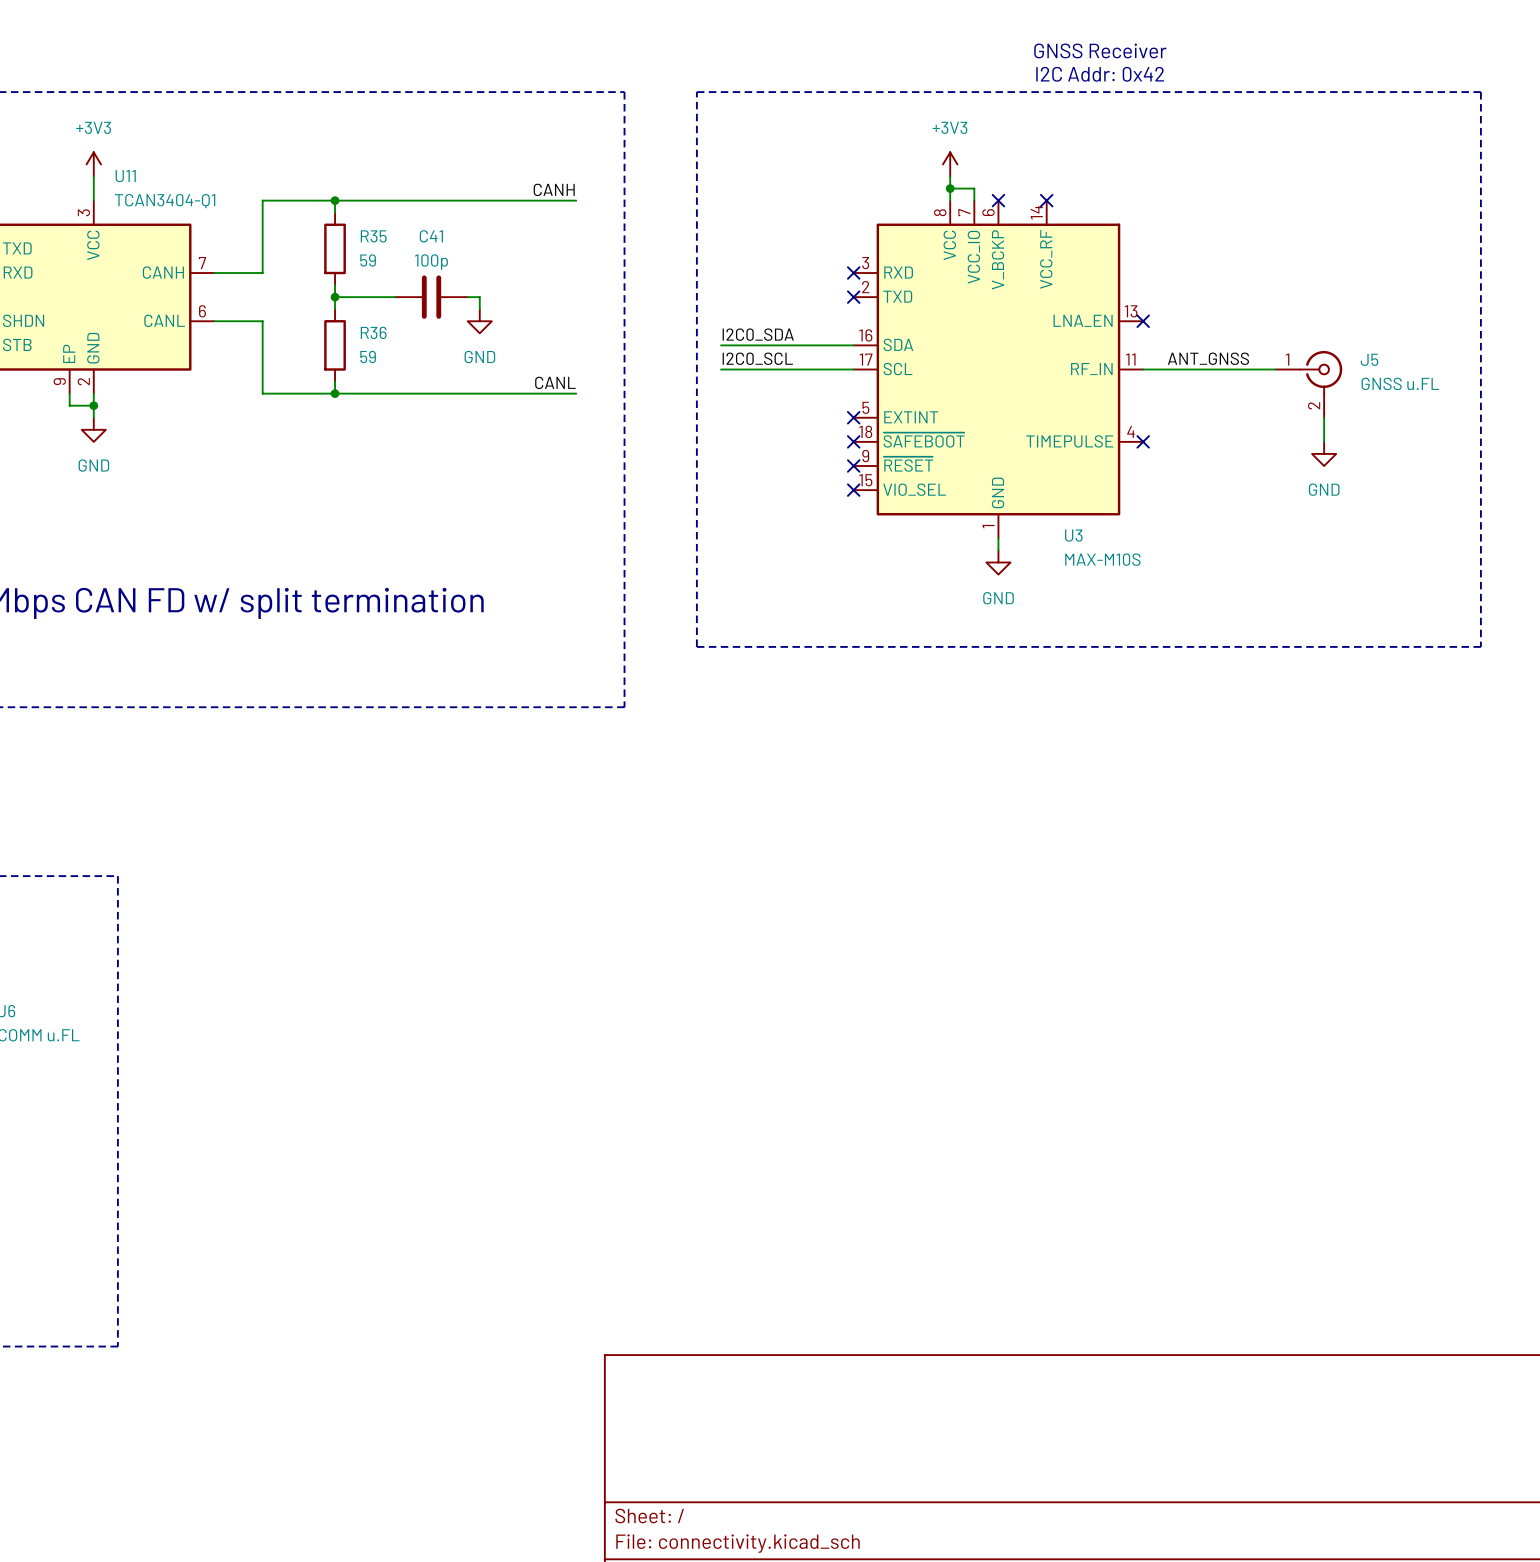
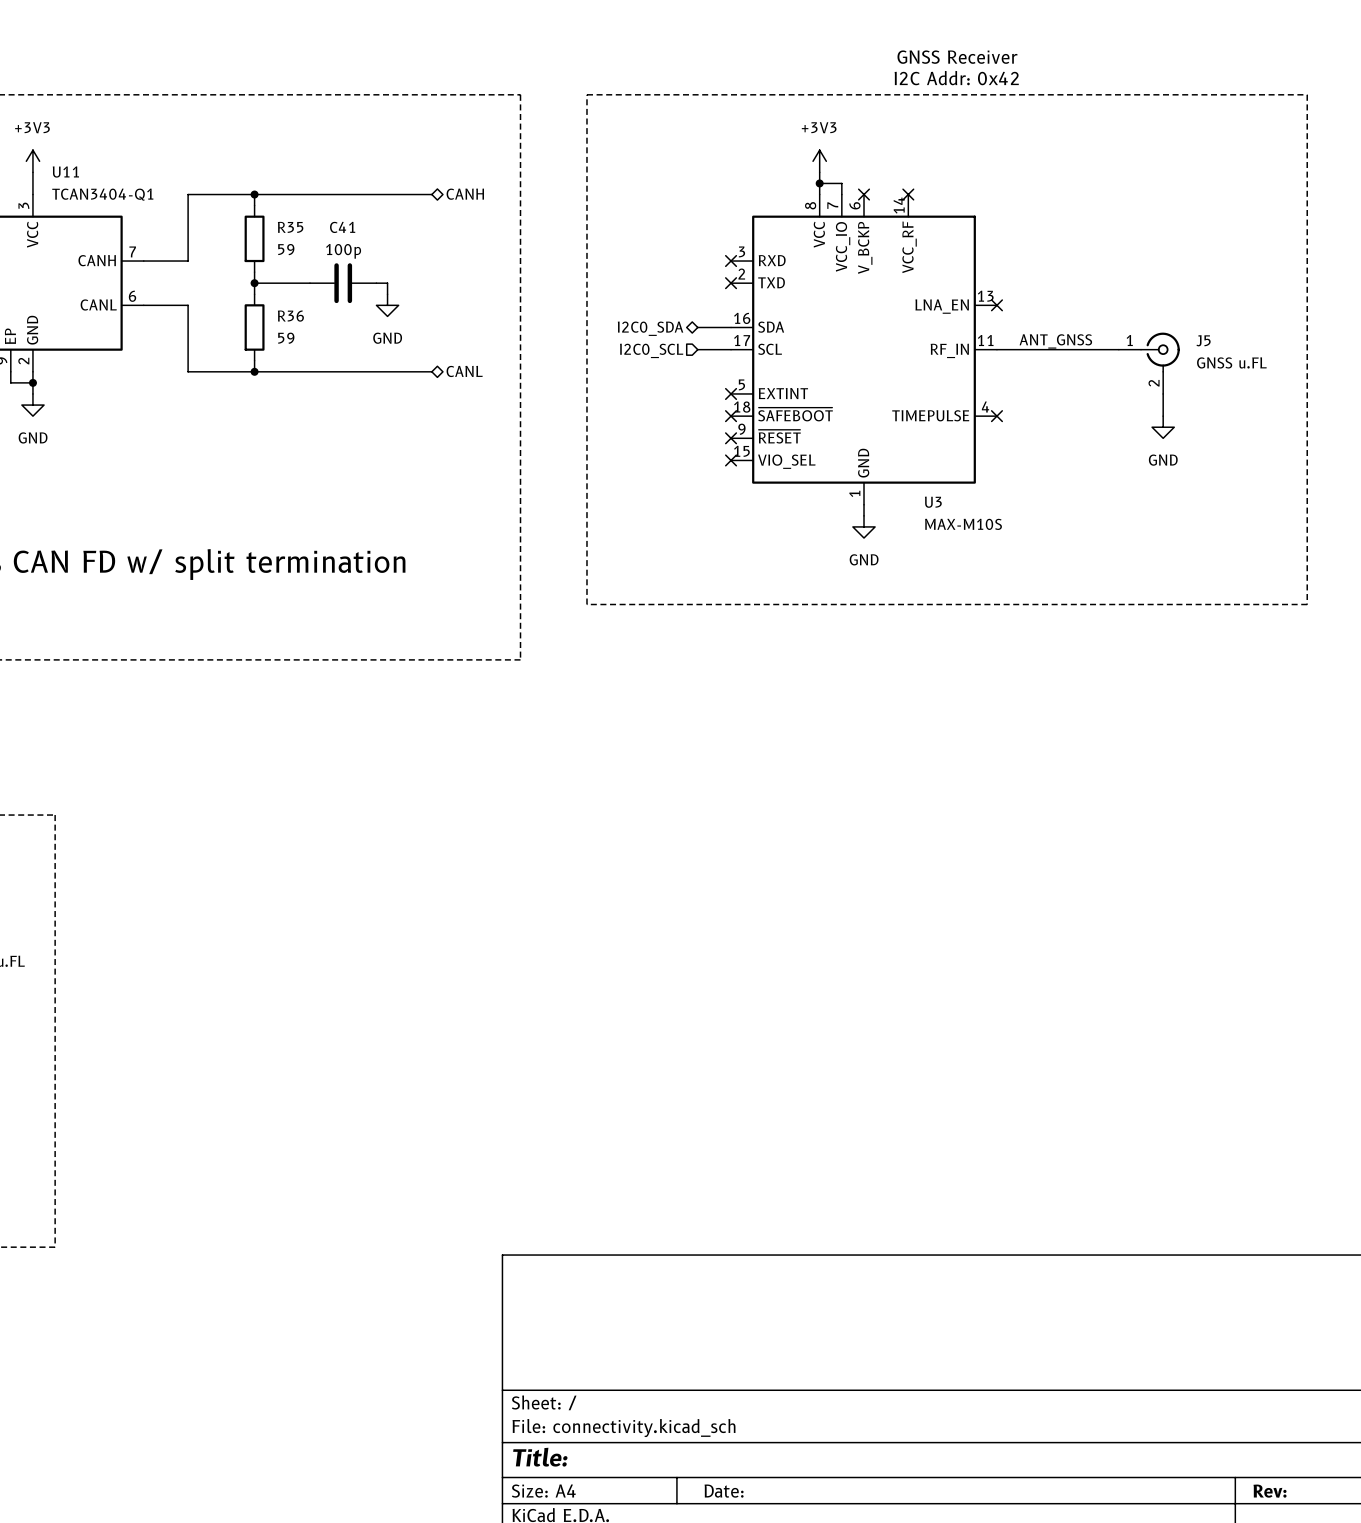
label: CANH (554, 189) -> none
wire: (528, 200) (576, 200) -> none
hierarchical label: none -> CANH (465, 194)
label: I2C0_SDA (758, 334) -> none
hierarchical label: none -> I2C0_SDA (650, 328)
wire: (721, 345) (817, 345) -> none
label: I2C0_SCL (757, 358) -> none
wire: (721, 369) (817, 369) -> none
hierarchical label: none -> I2C0_SCL (651, 350)
label: CANL (555, 382) -> none
wire: (528, 393) (576, 393) -> none
hierarchical label: none -> CANL (464, 371)

